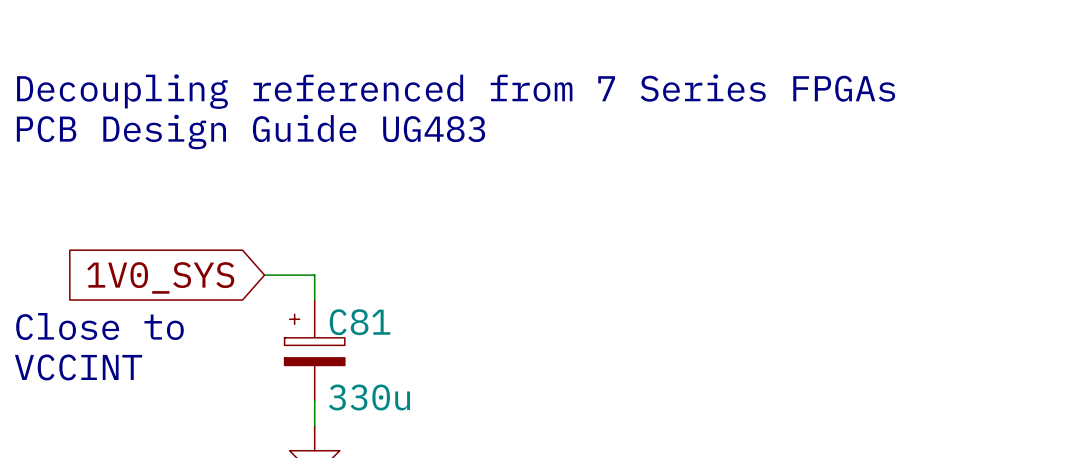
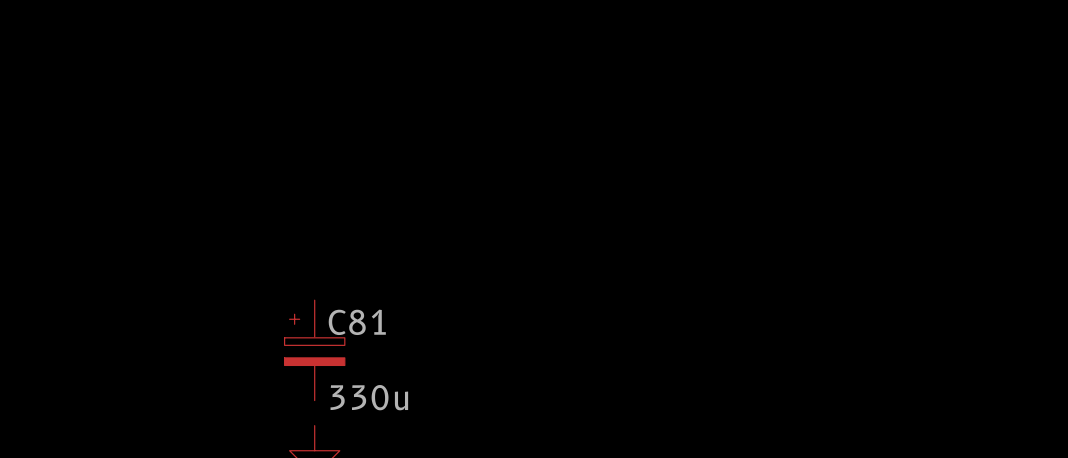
text: Decoupling referenced from 7 Series FPGAs (456, 91) -> none
text: PCB Design Guide UG483 (251, 132) -> none
wire: (264, 275) (314, 275) (314, 300) -> none
global label: 1V0_SYS (160, 277) -> none
text: Close to (99, 326) -> none
text: VCCINT (78, 367) -> none
wire: (314, 400) (314, 425) -> none

